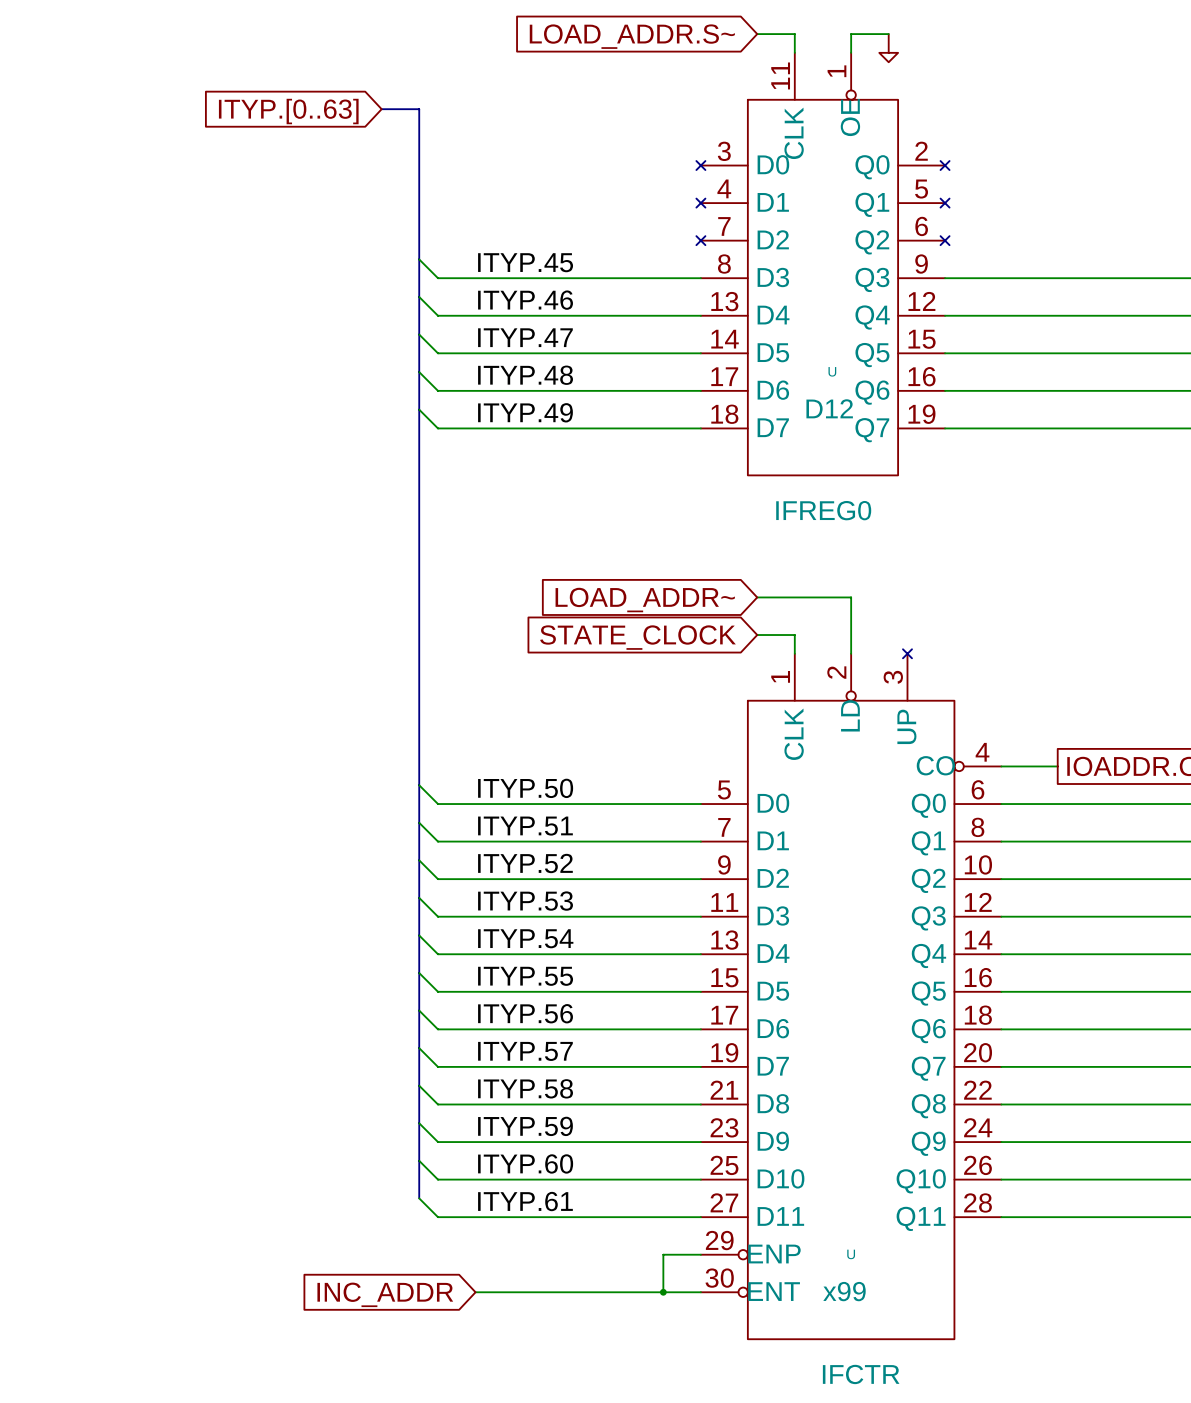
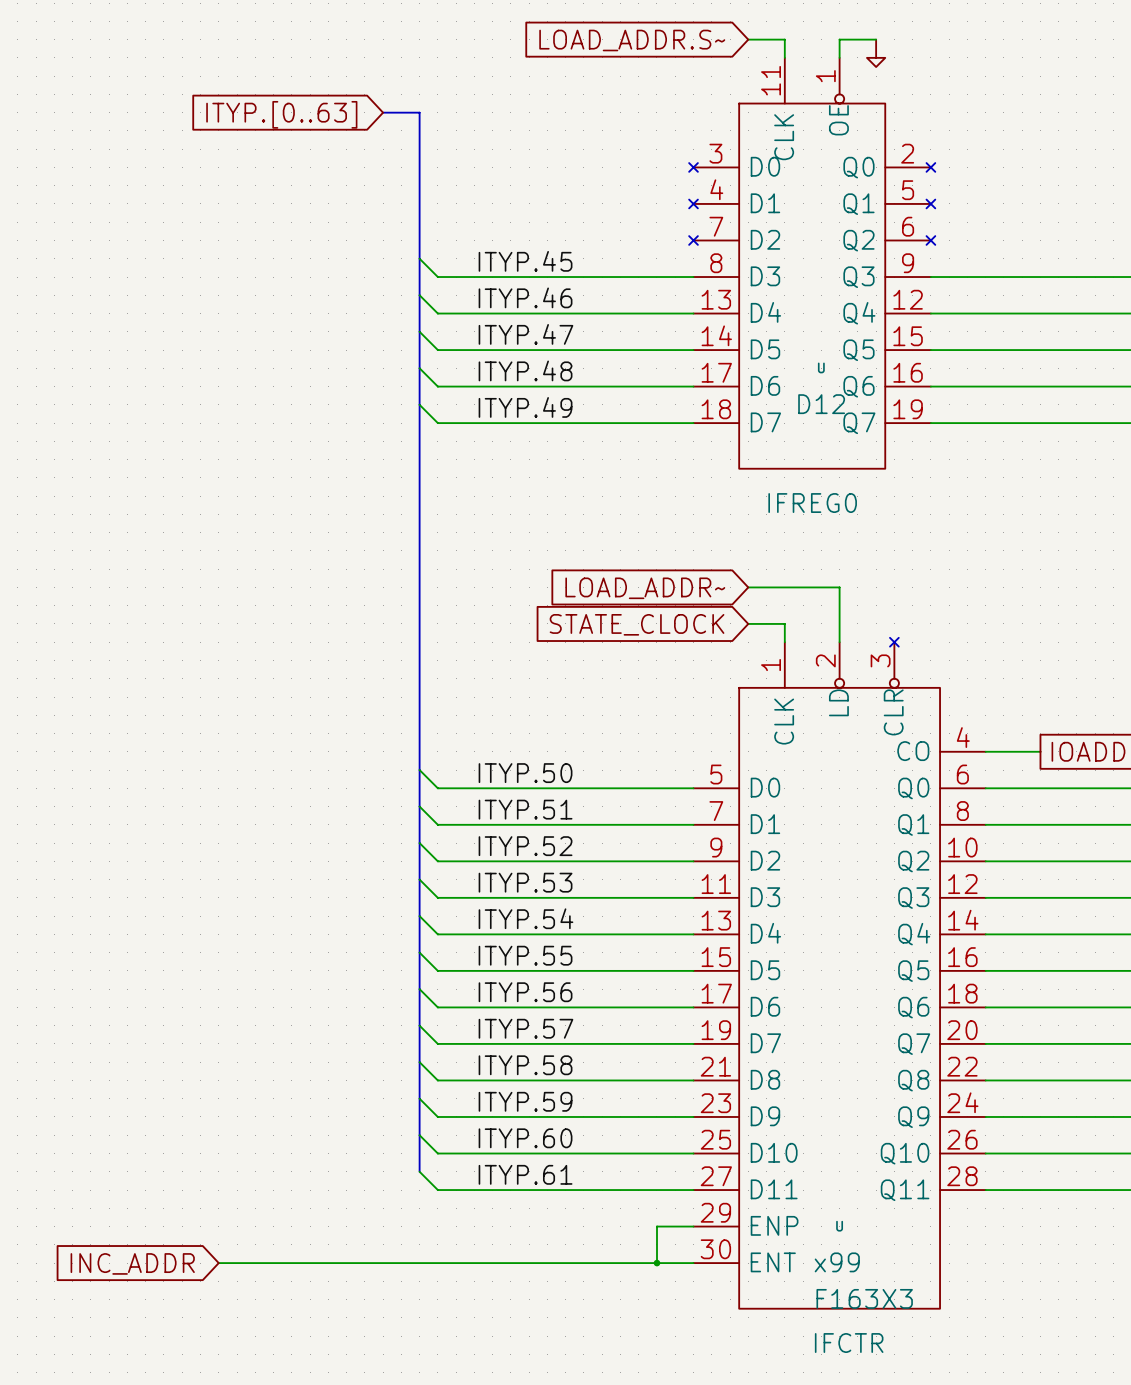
U symbol: [700, 653, 1002, 1340] -> [693, 642, 986, 1309]
wire: none -> (218, 1263) (474, 1263)
global label: none -> INC_ADDR (132, 1263)
global label: INC_ADDR (385, 1294) -> none
U value: none -> F163X3 (864, 1298)

